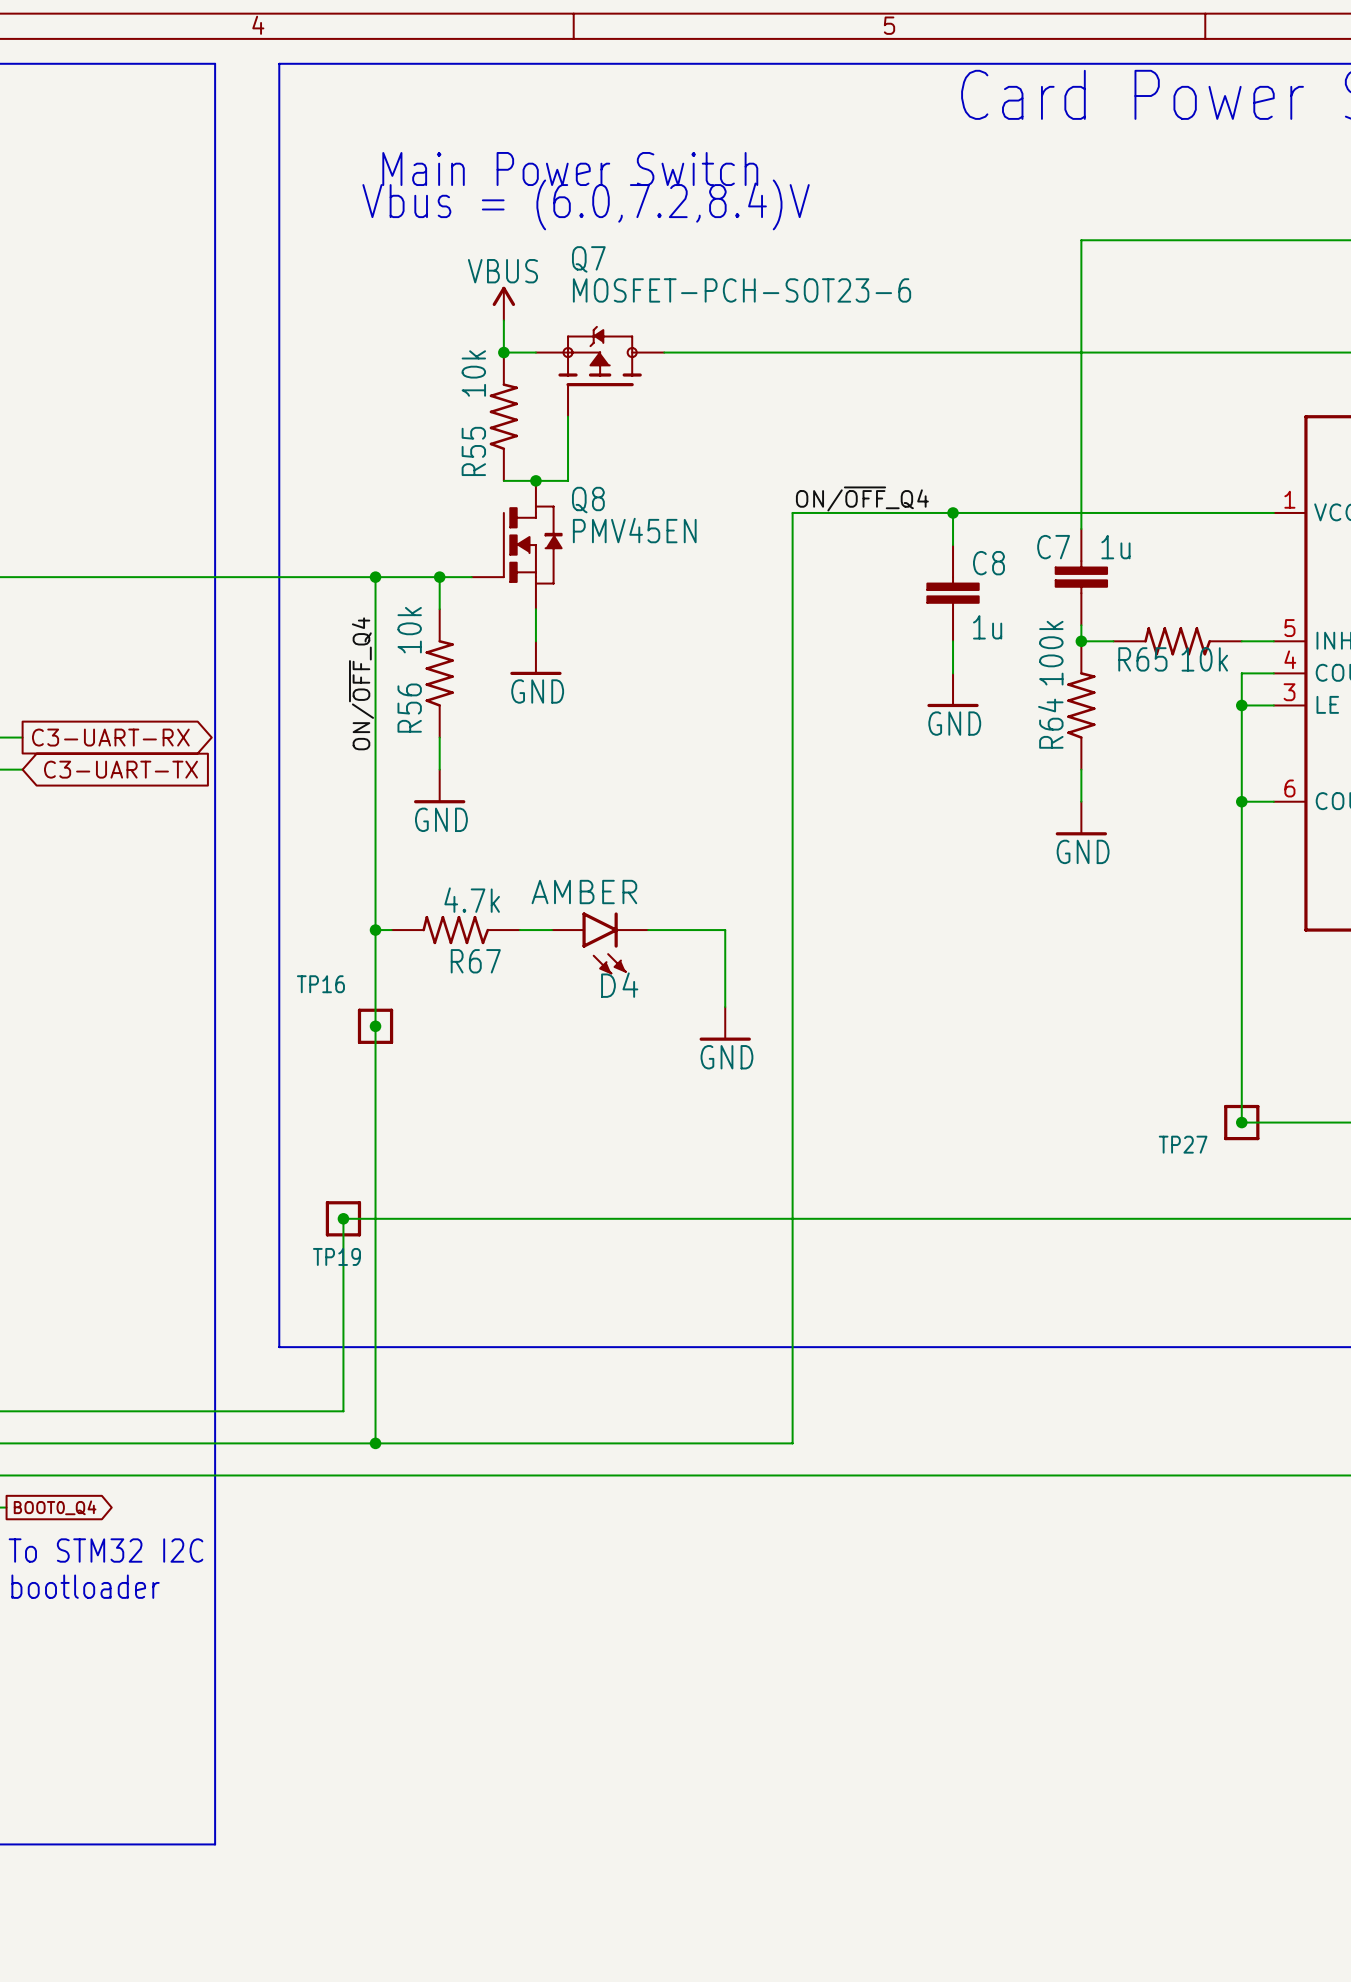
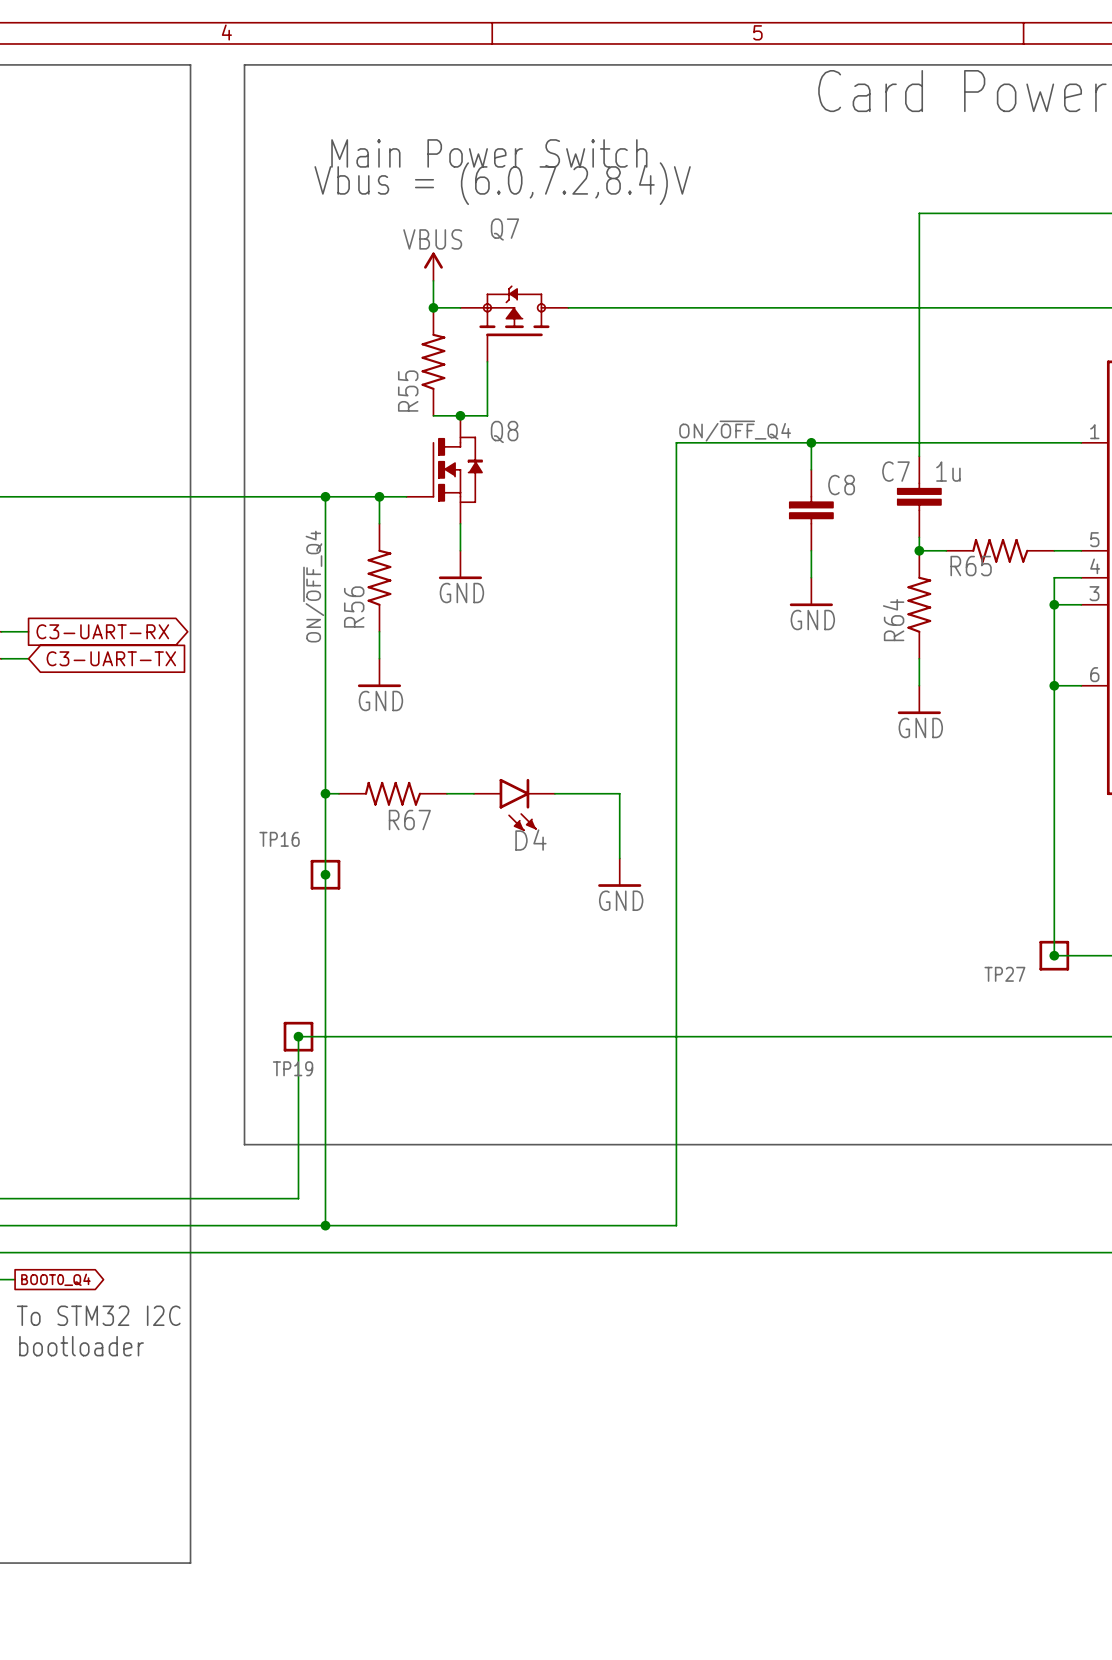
Q7 value: MOSFET-PCH-SOT23-6 (742, 290) -> none
R55 value: 10k (473, 373) -> none
Q8 value: PMV45EN (634, 530) -> none
C8 value: 1u (987, 627) -> none
R56 value: 10k (409, 630) -> none
R64 value: 100k (1051, 653) -> none
R65 value: 10k (1204, 659) -> none
D4 value: AMBER (584, 892) -> none
R67 value: 4.7k (472, 900) -> none

